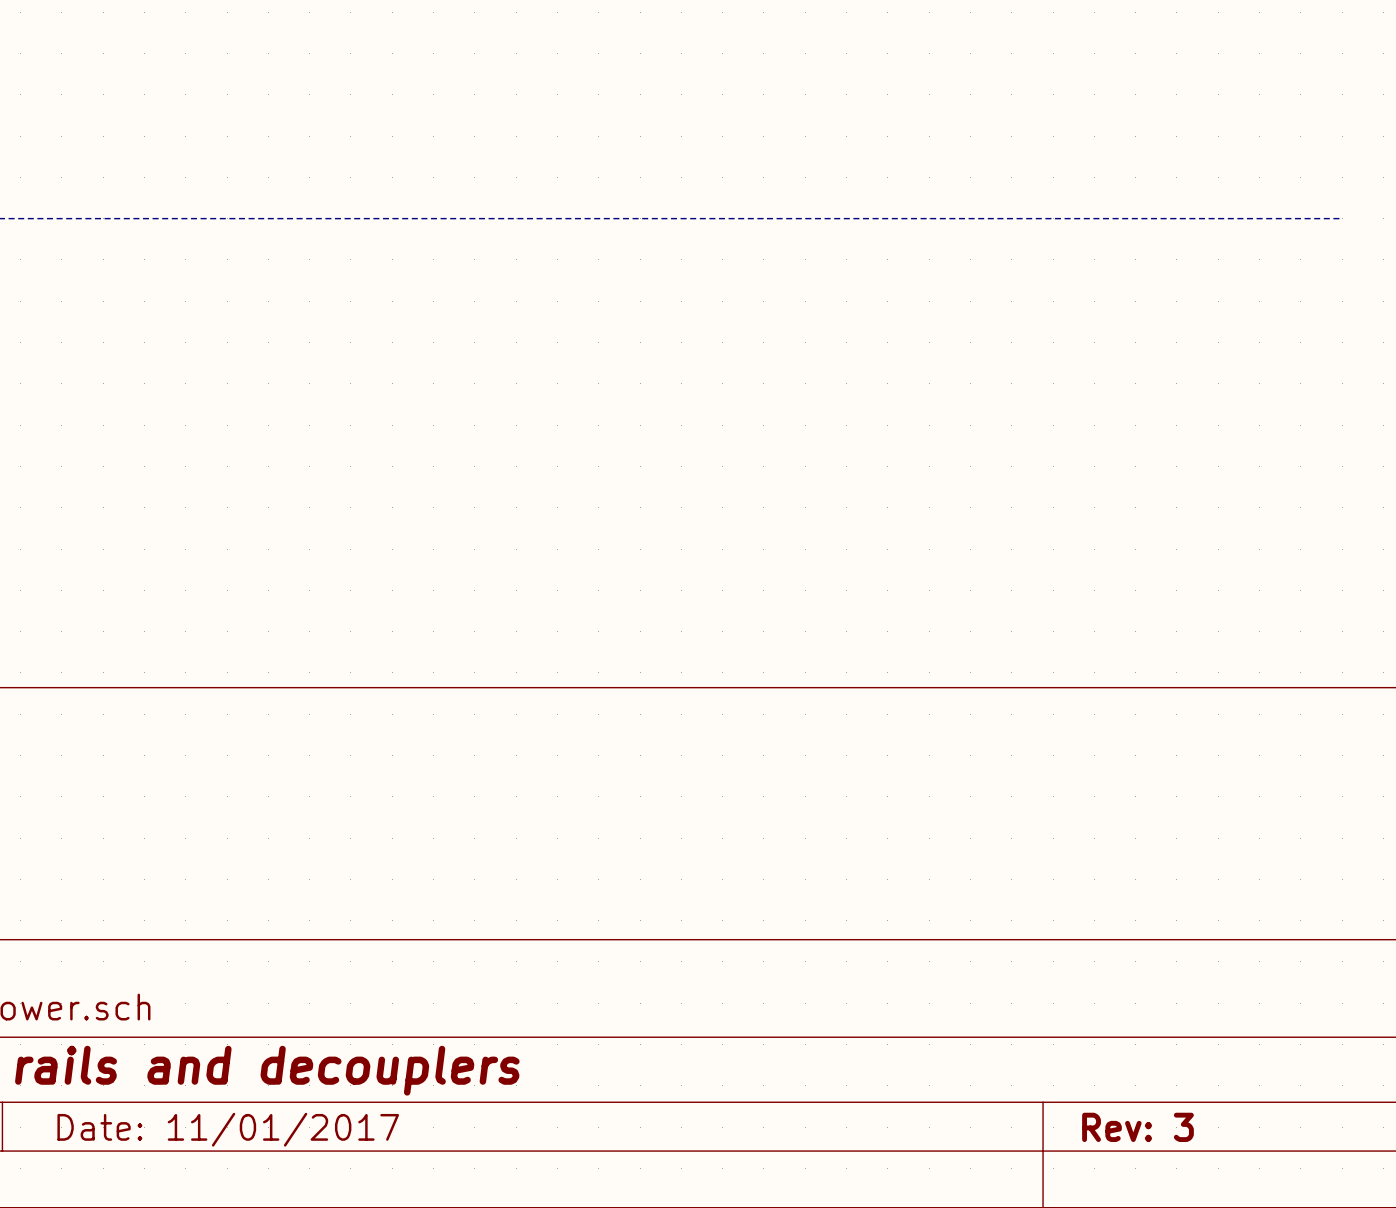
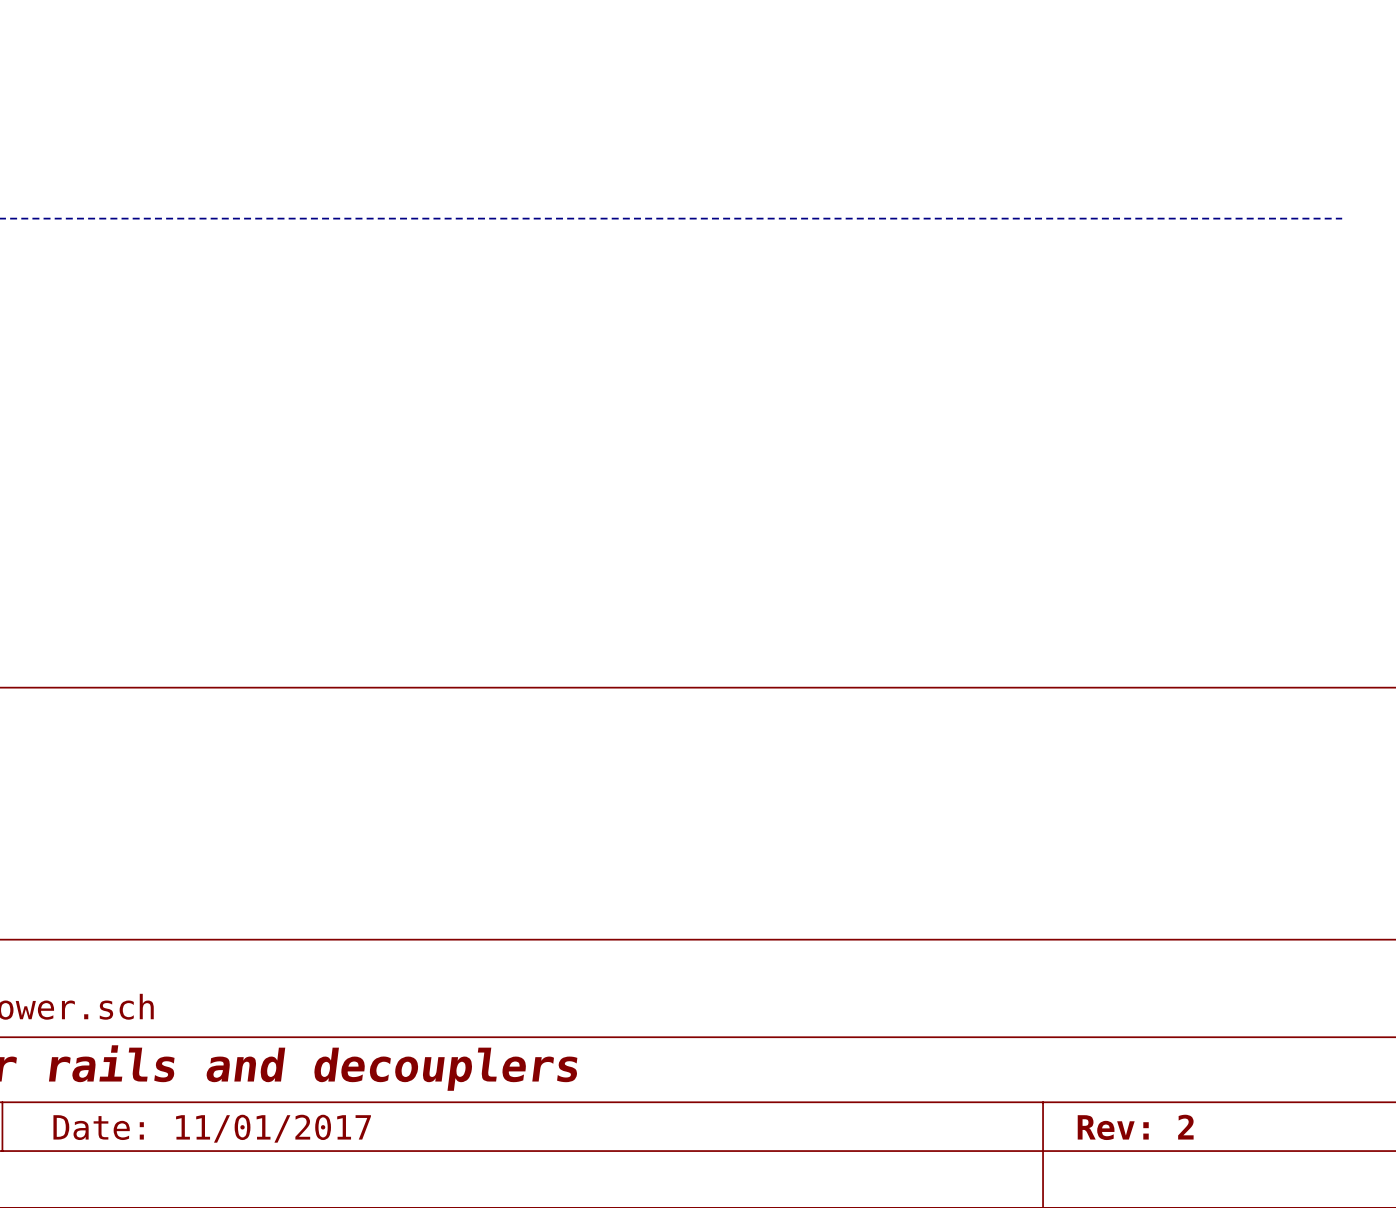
title block: Rev: 3 (1137, 1127) -> Rev: 2 (1135, 1127)

